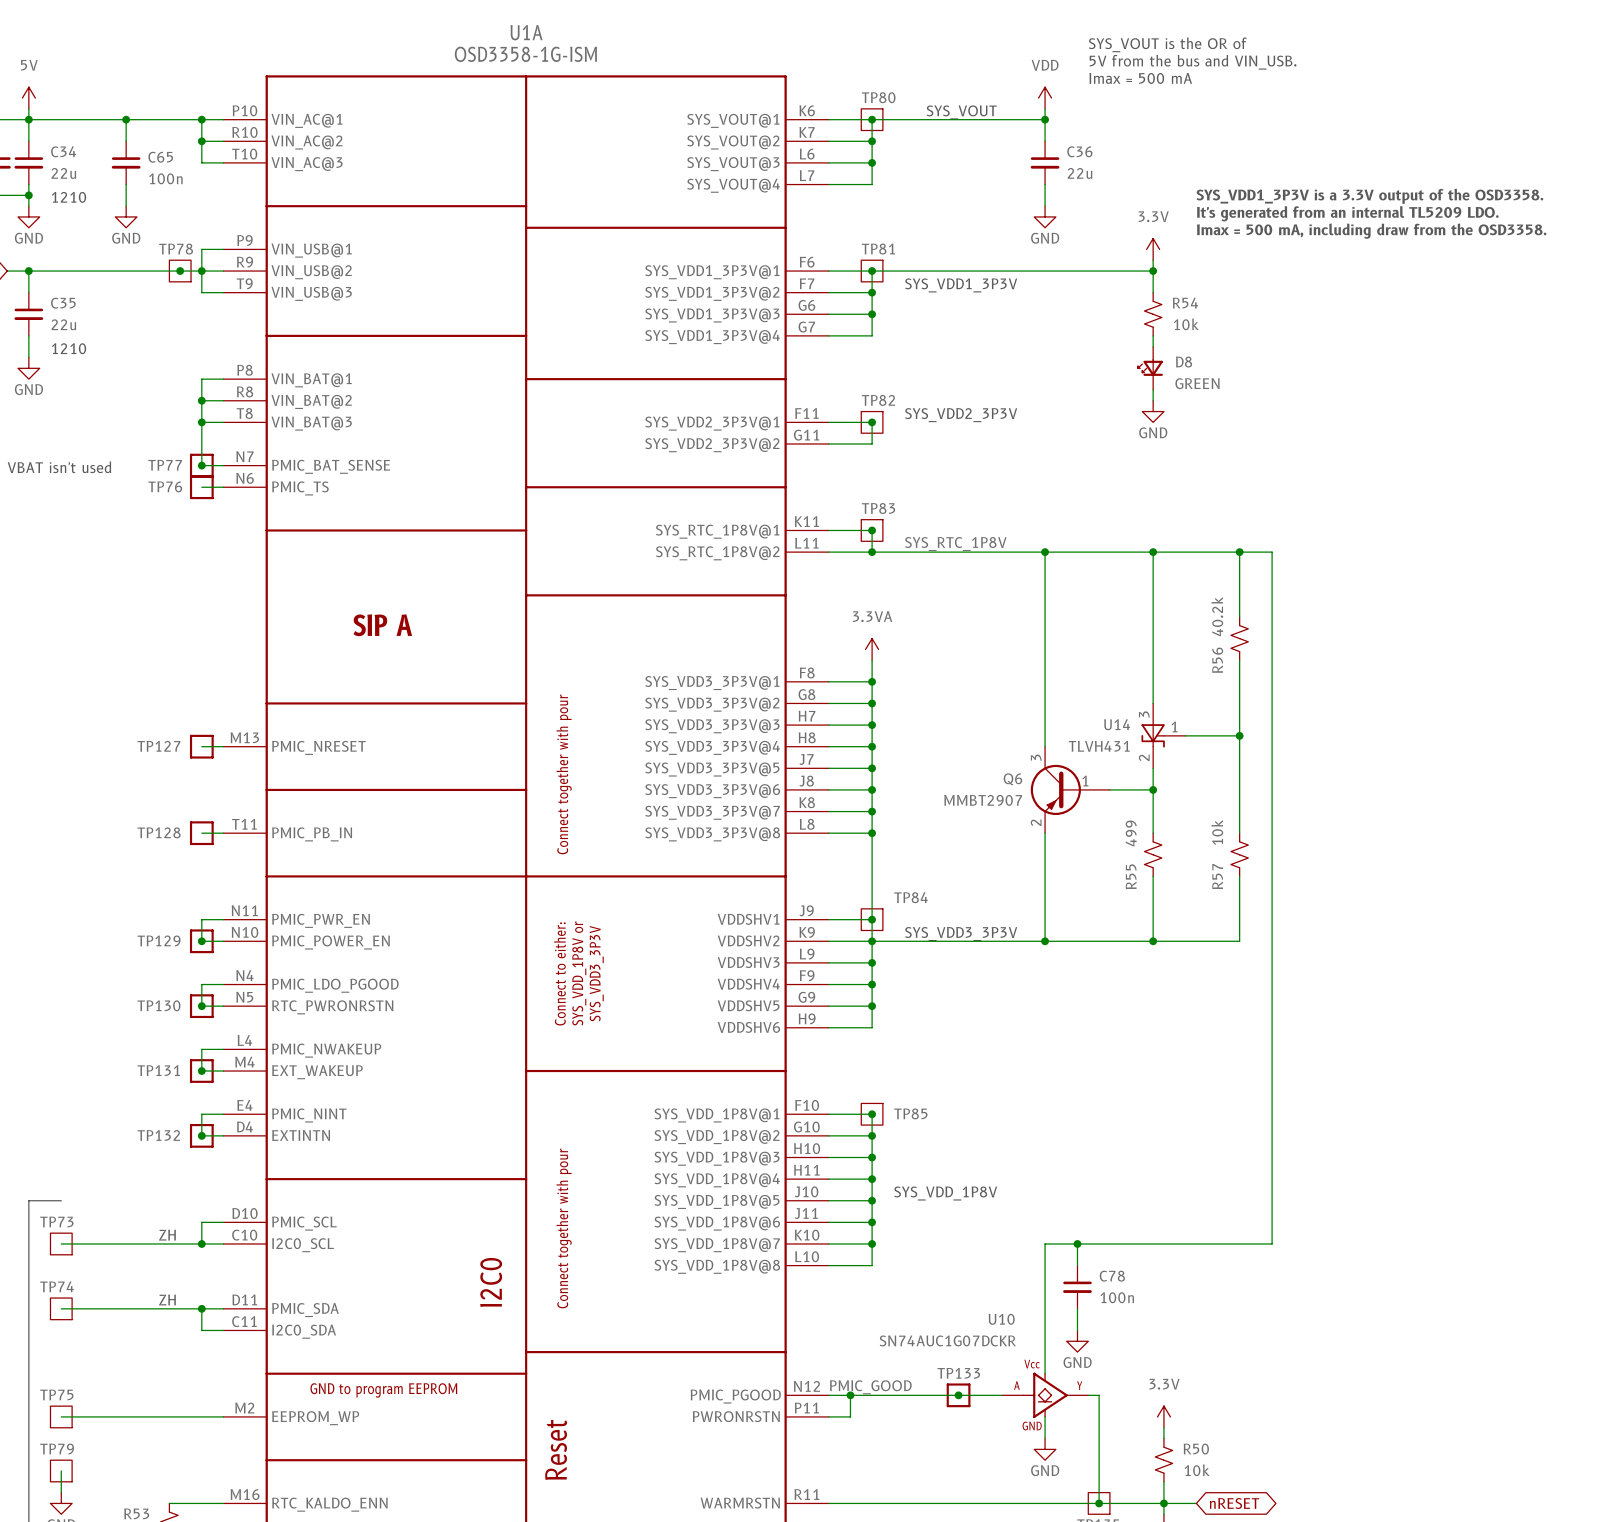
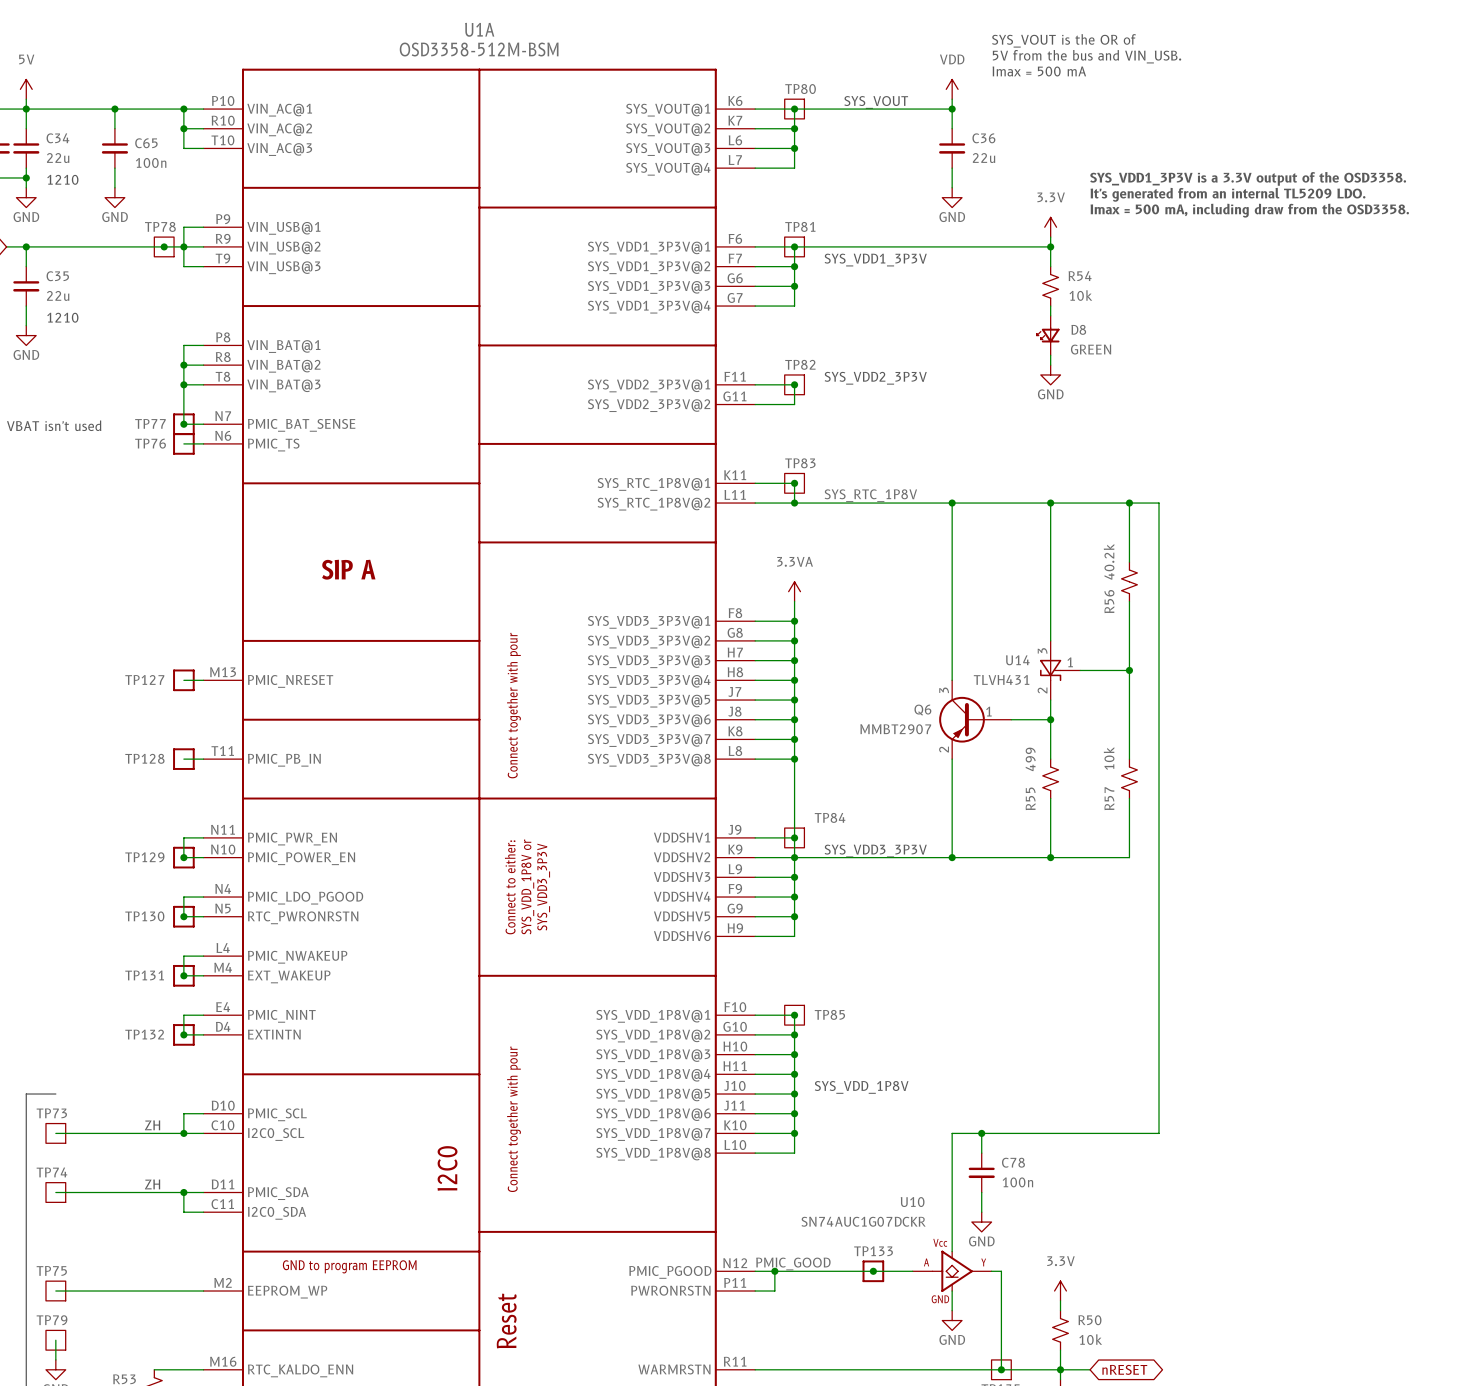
U1A value: OSD3358-1G-ISM (525, 54) -> OSD3358-512M-BSM (479, 49)

